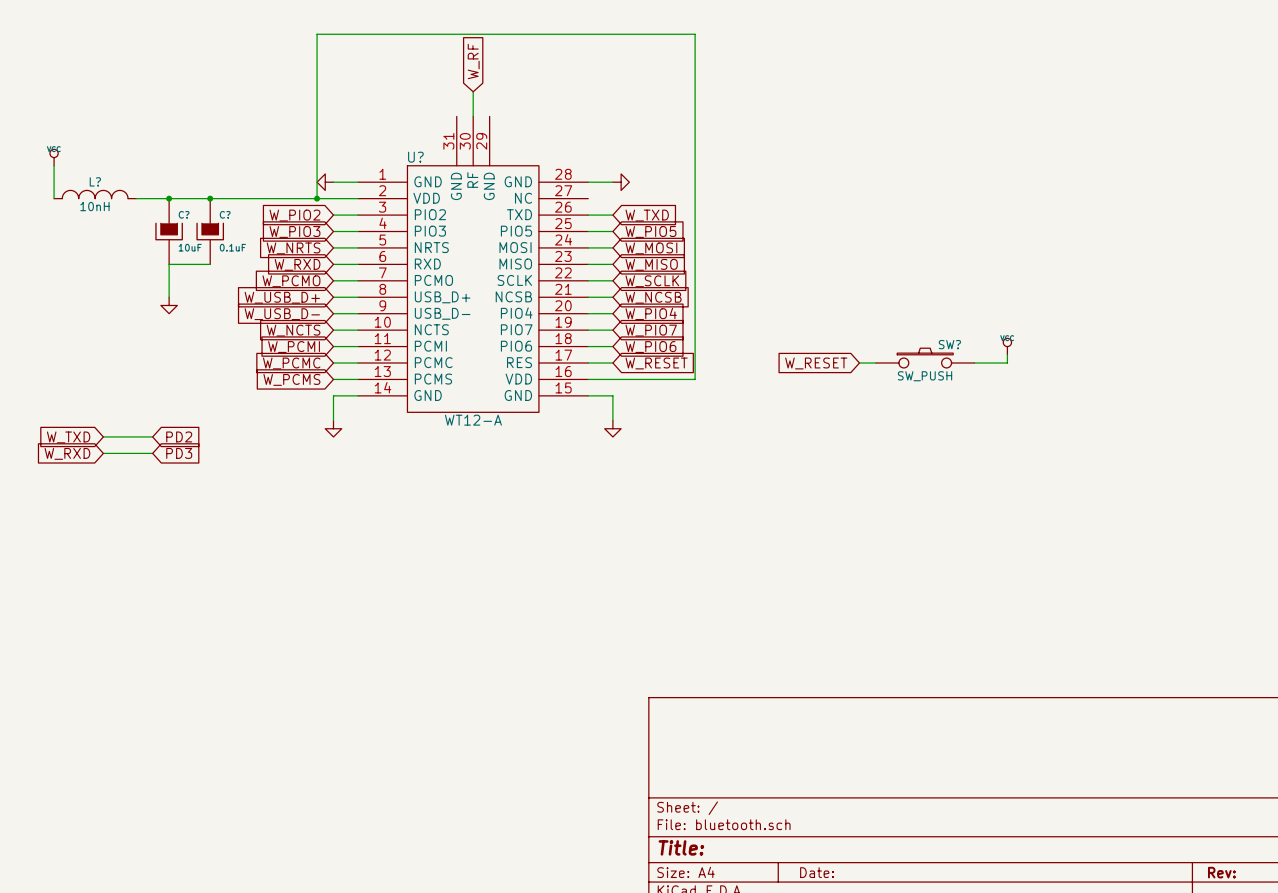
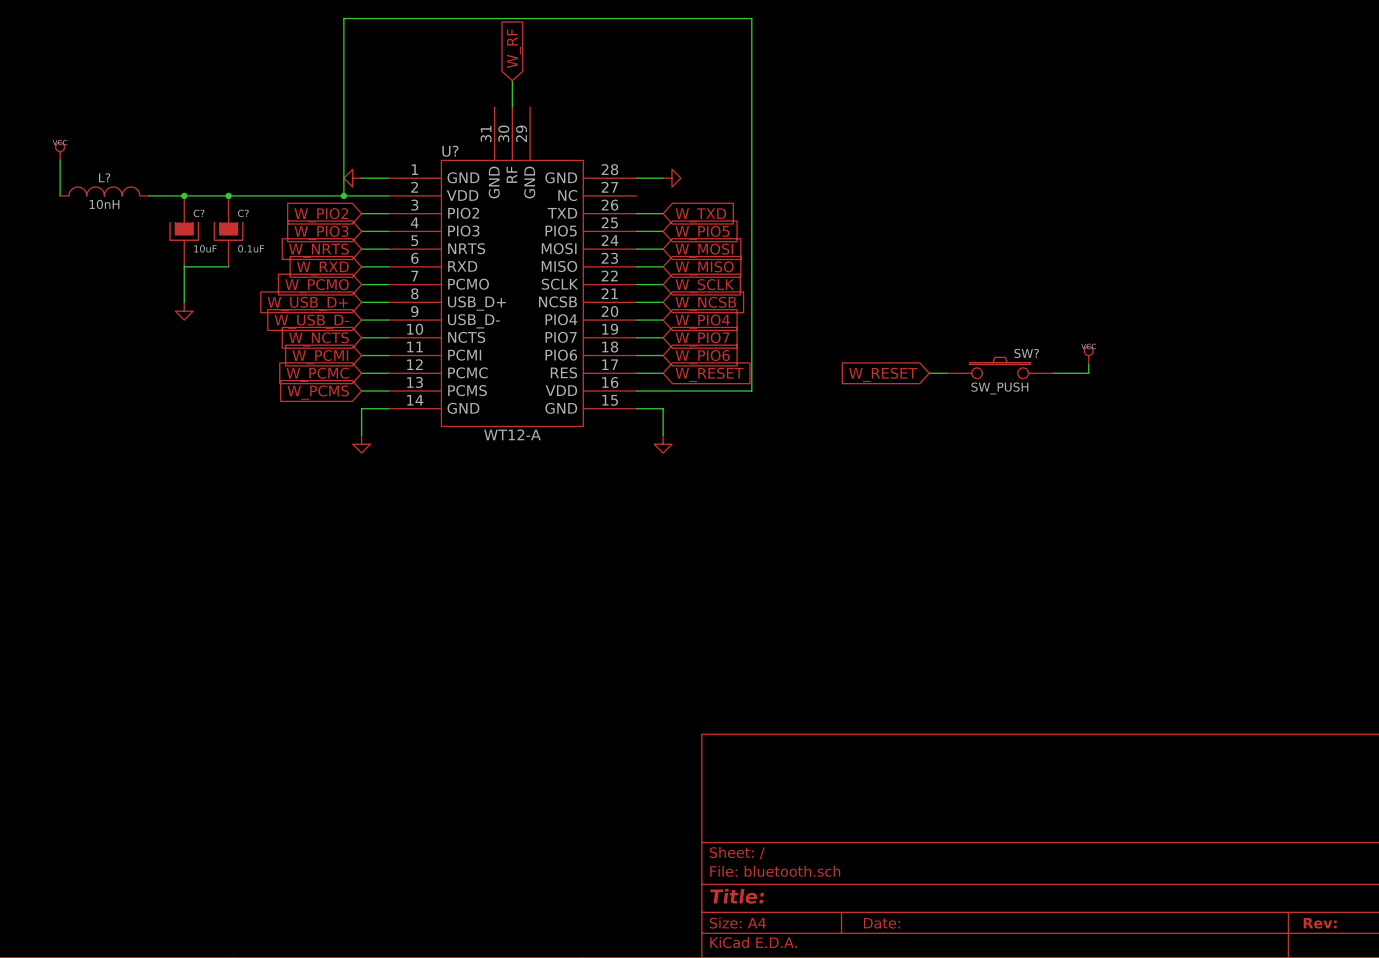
wire: (103, 436) (152, 436) -> none
global label: PD2 (179, 436) -> none
global label: W_TXD (68, 437) -> none
global label: W_RXD (67, 453) -> none
wire: (103, 453) (152, 453) -> none
global label: PD3 (179, 453) -> none

